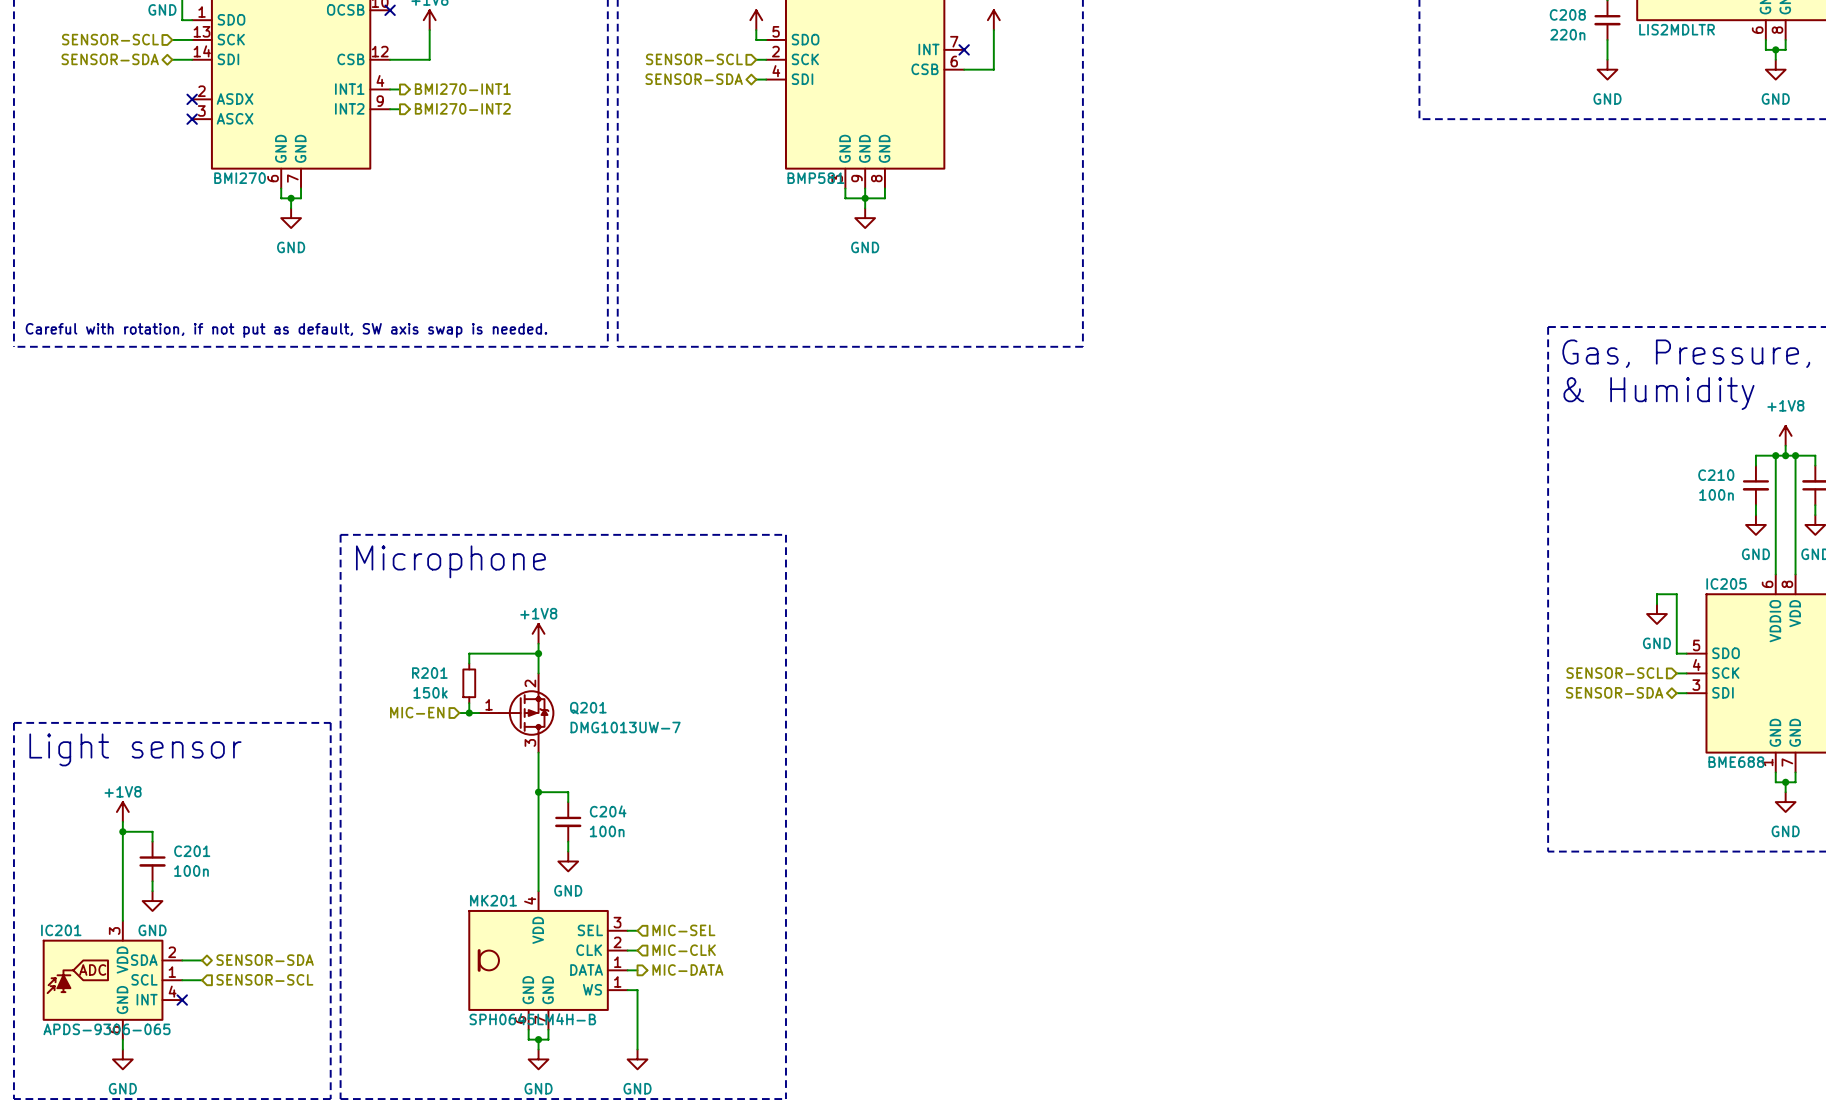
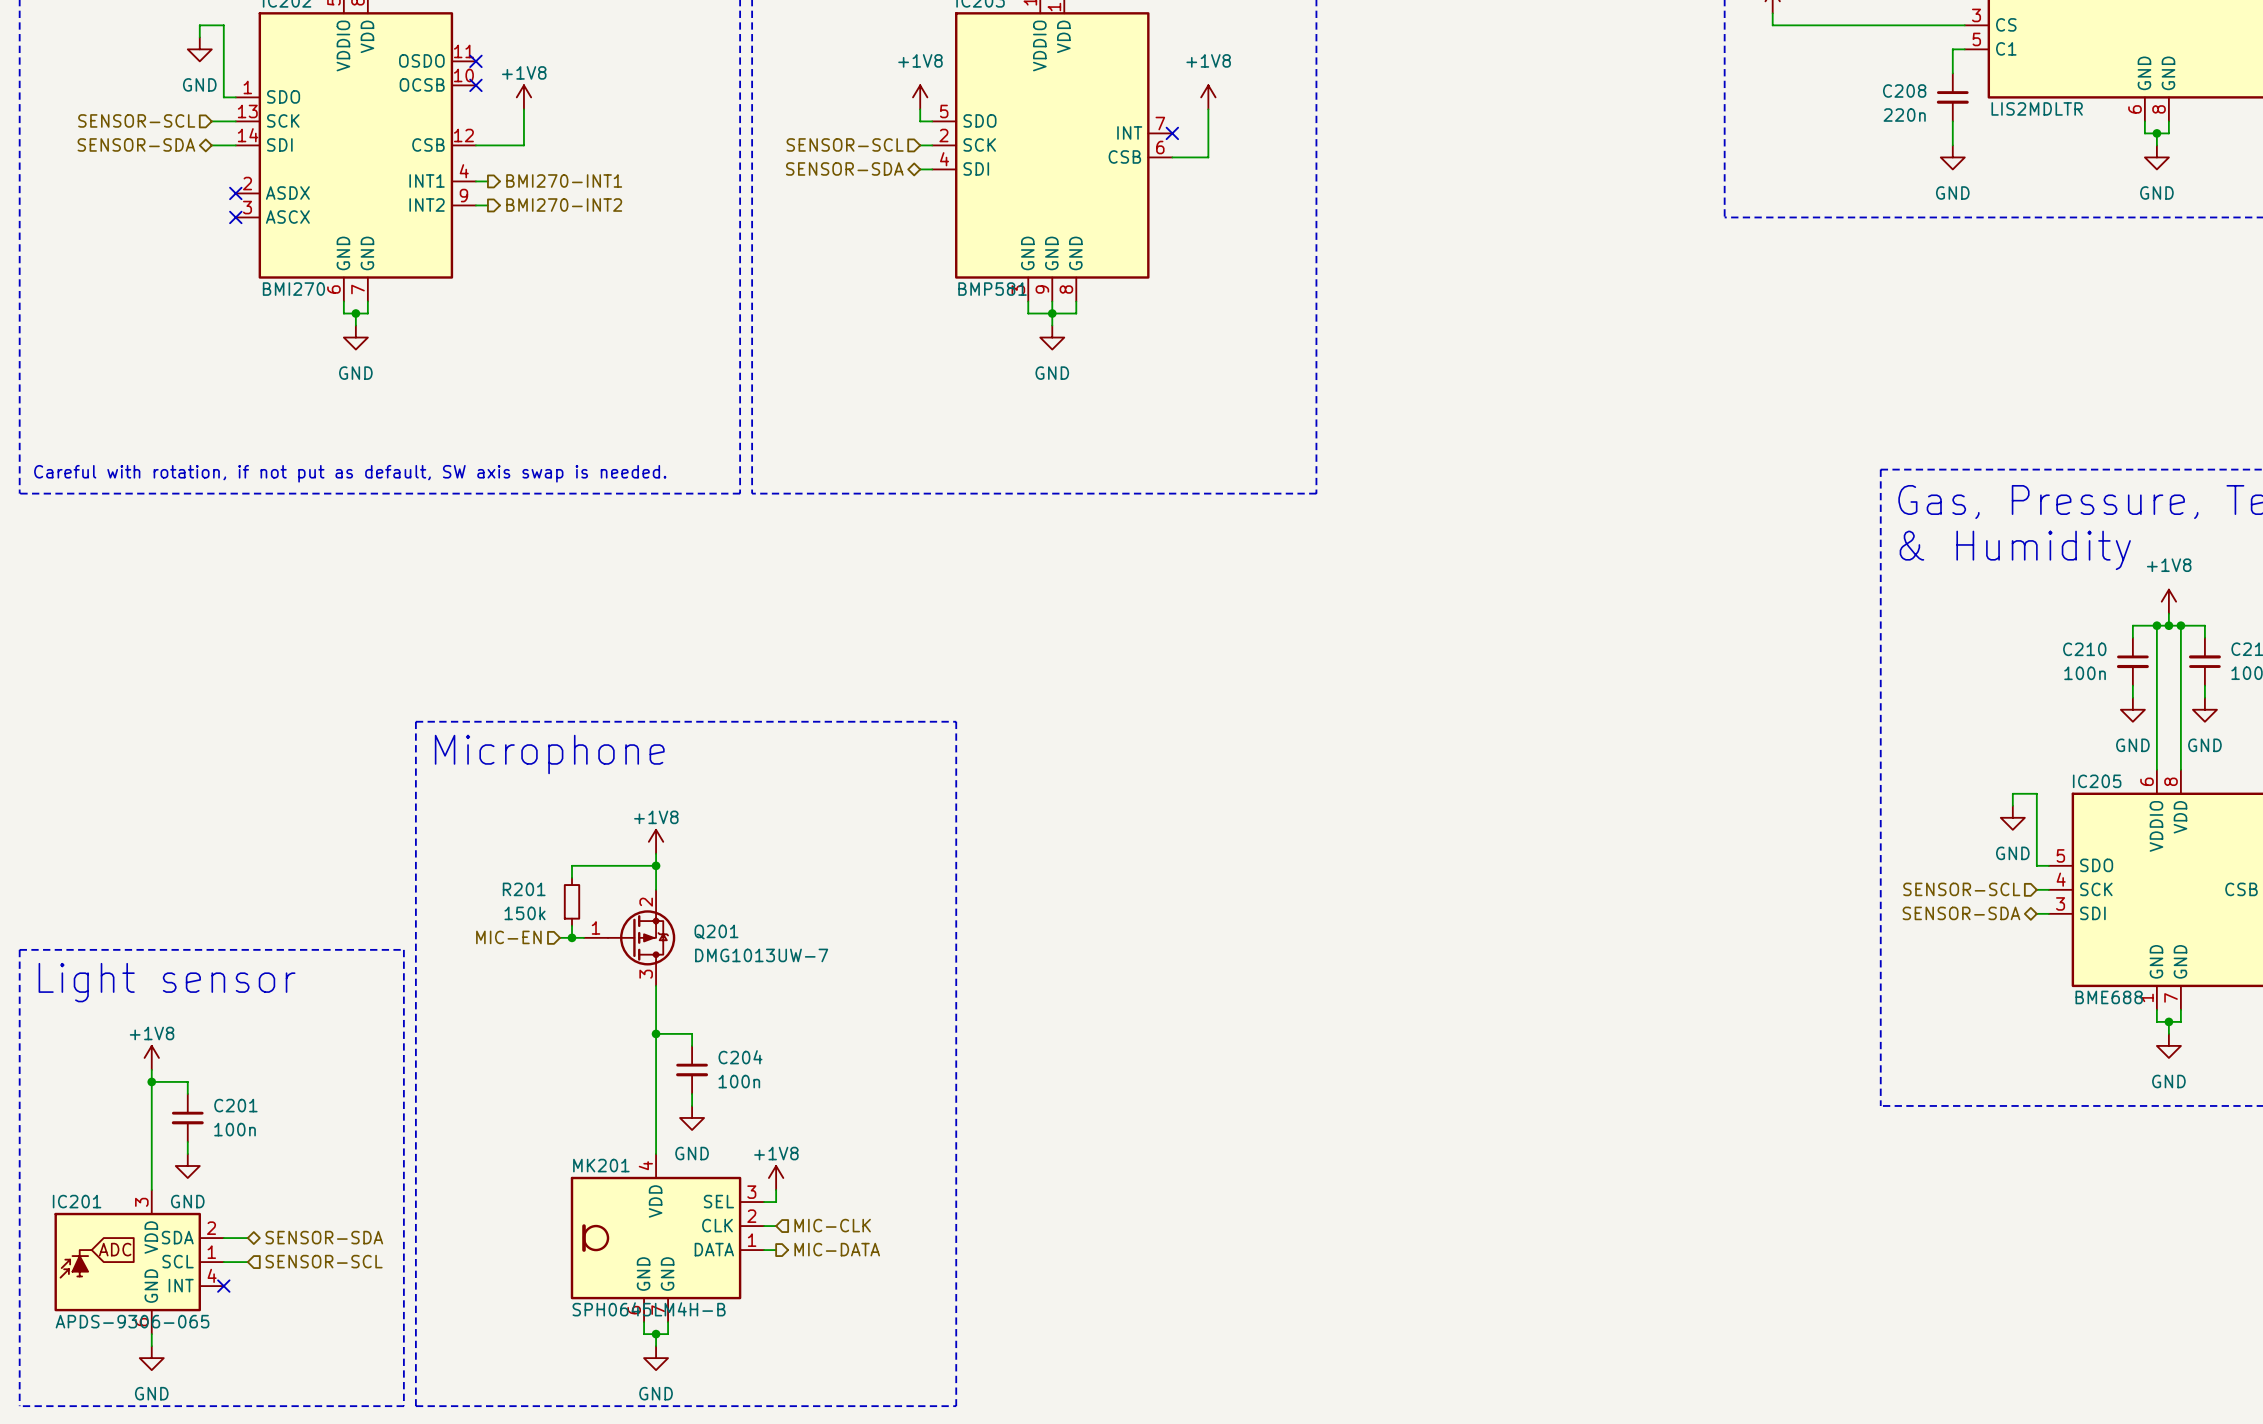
MK201 symbol: [468, 891, 628, 1030] -> [570, 1154, 765, 1323]
power symbol: none -> +1V8 (776, 1178)
wire: none -> (776, 1190) (776, 1202)
hierarchical label: MIC-SEL (683, 930) -> none
wire: (627, 990) (637, 990) (637, 1049) -> none
power symbol: GND (637, 1059) -> none

